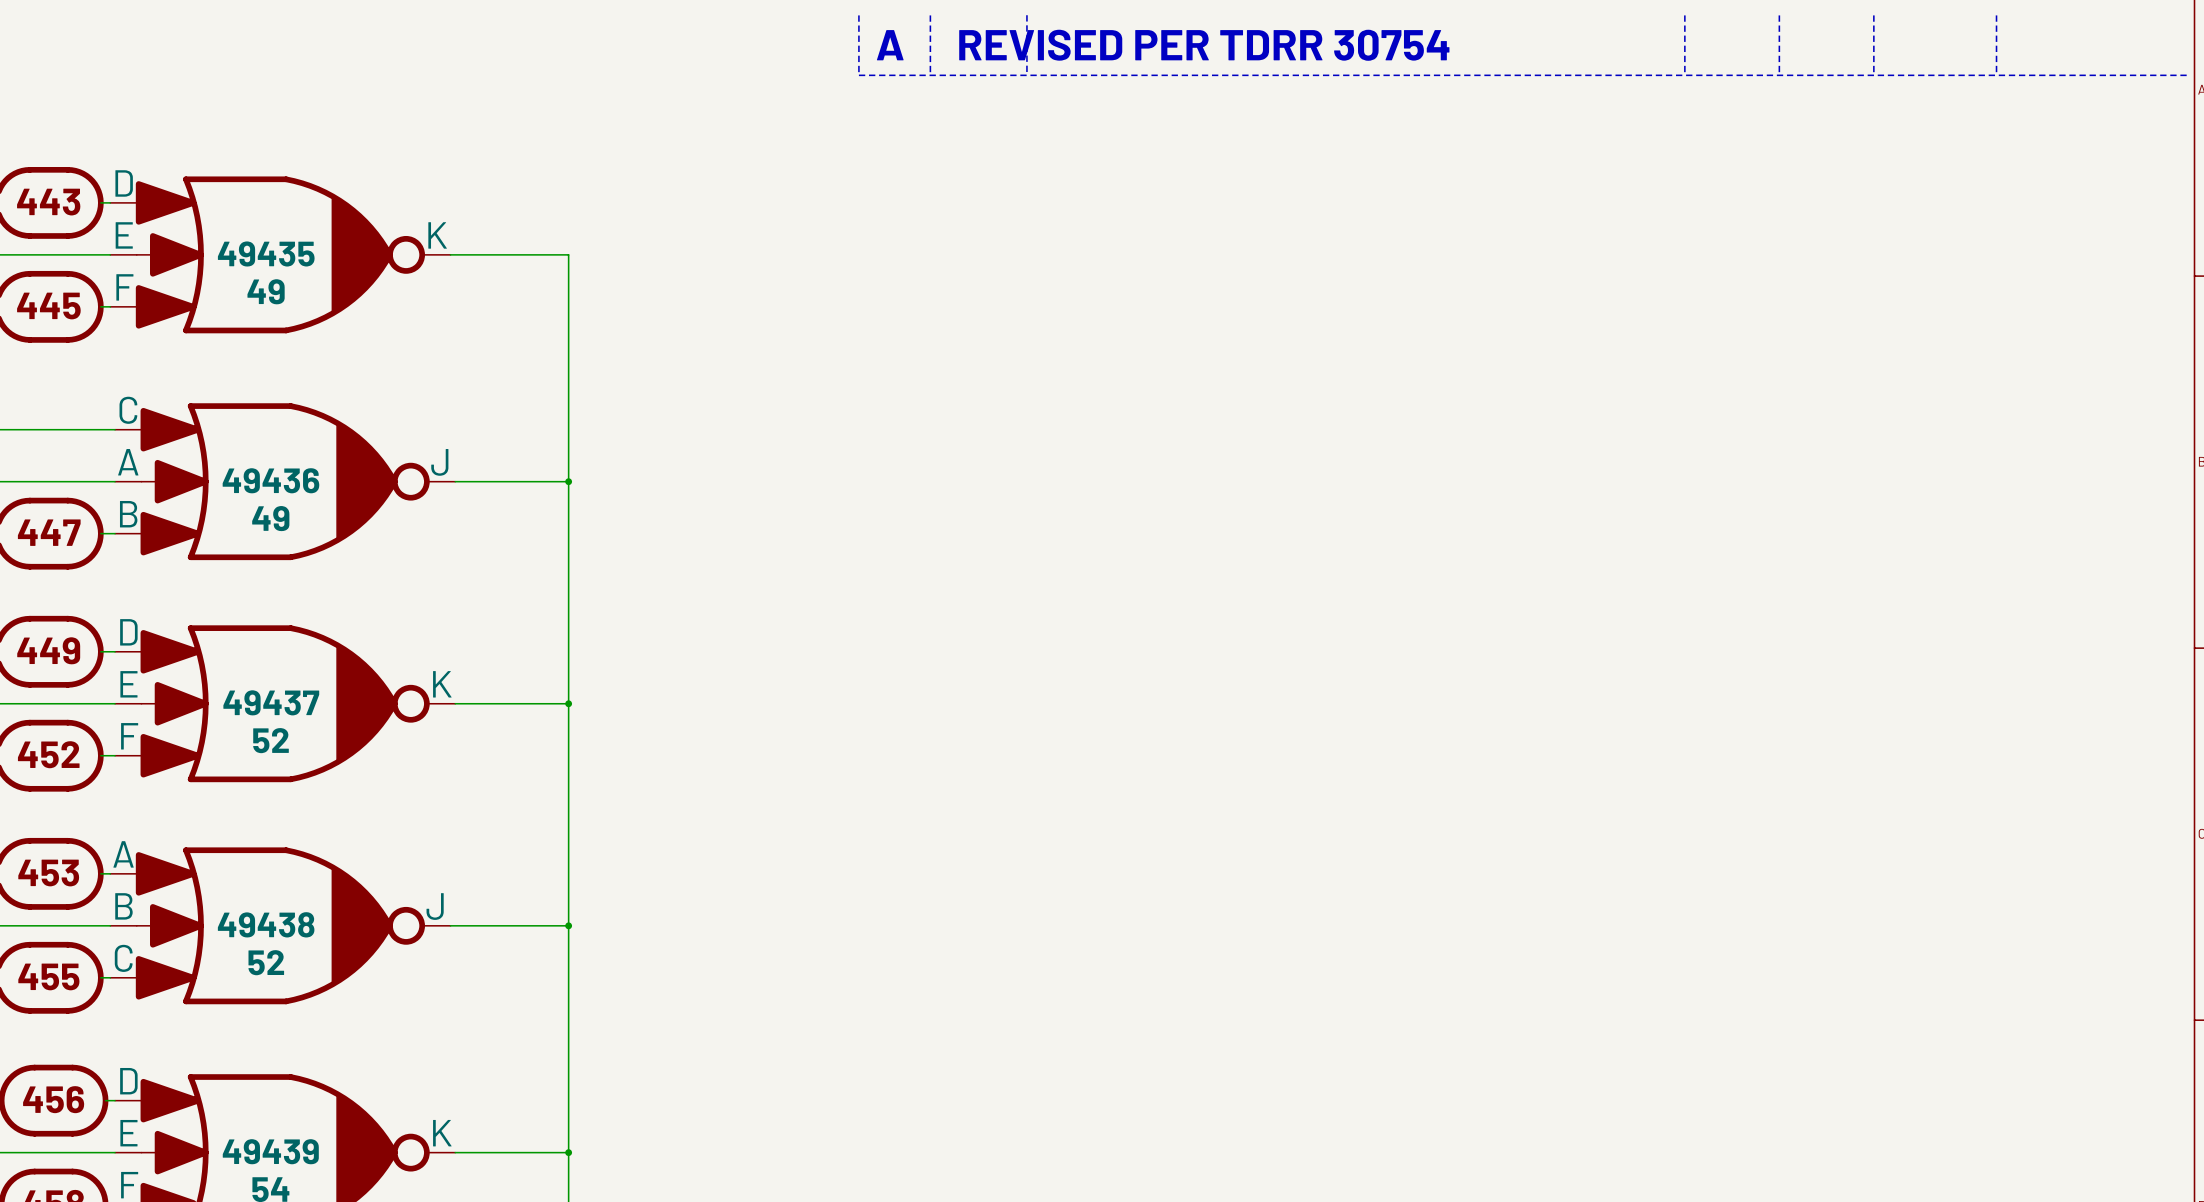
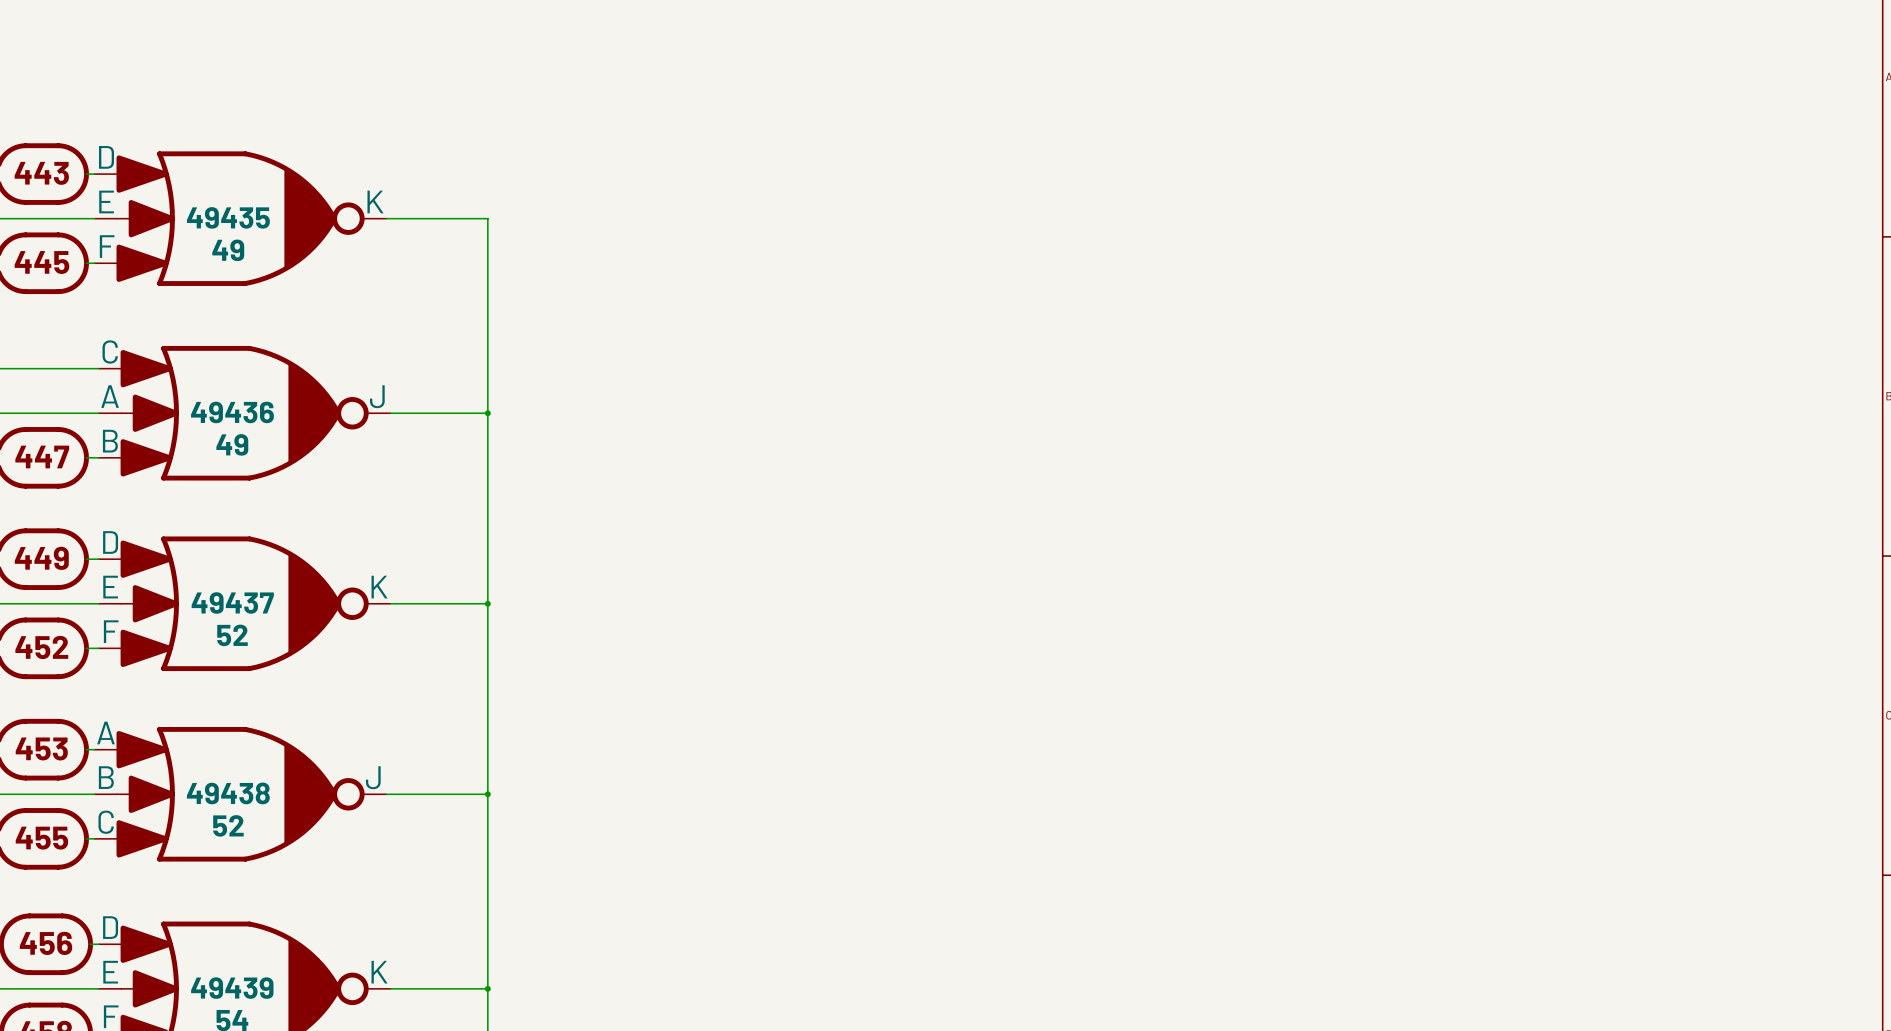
line: (858, 15) (858, 75) (2189, 75) -> none
line: (930, 15) (930, 75) -> none
line: (1026, 15) (1026, 75) -> none
line: (1684, 15) (1684, 75) -> none
line: (1779, 15) (1779, 75) -> none
line: (1873, 15) (1873, 75) -> none
line: (1996, 15) (1996, 75) -> none
text: A REVISED PER TDRR 30754 (1163, 45) -> none

